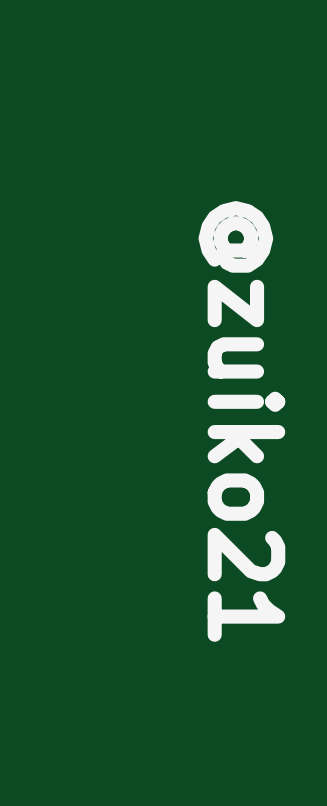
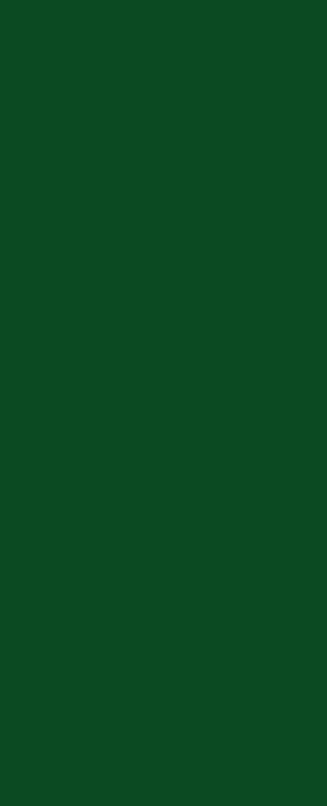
text: @zuiko21 (241, 421) -> none

